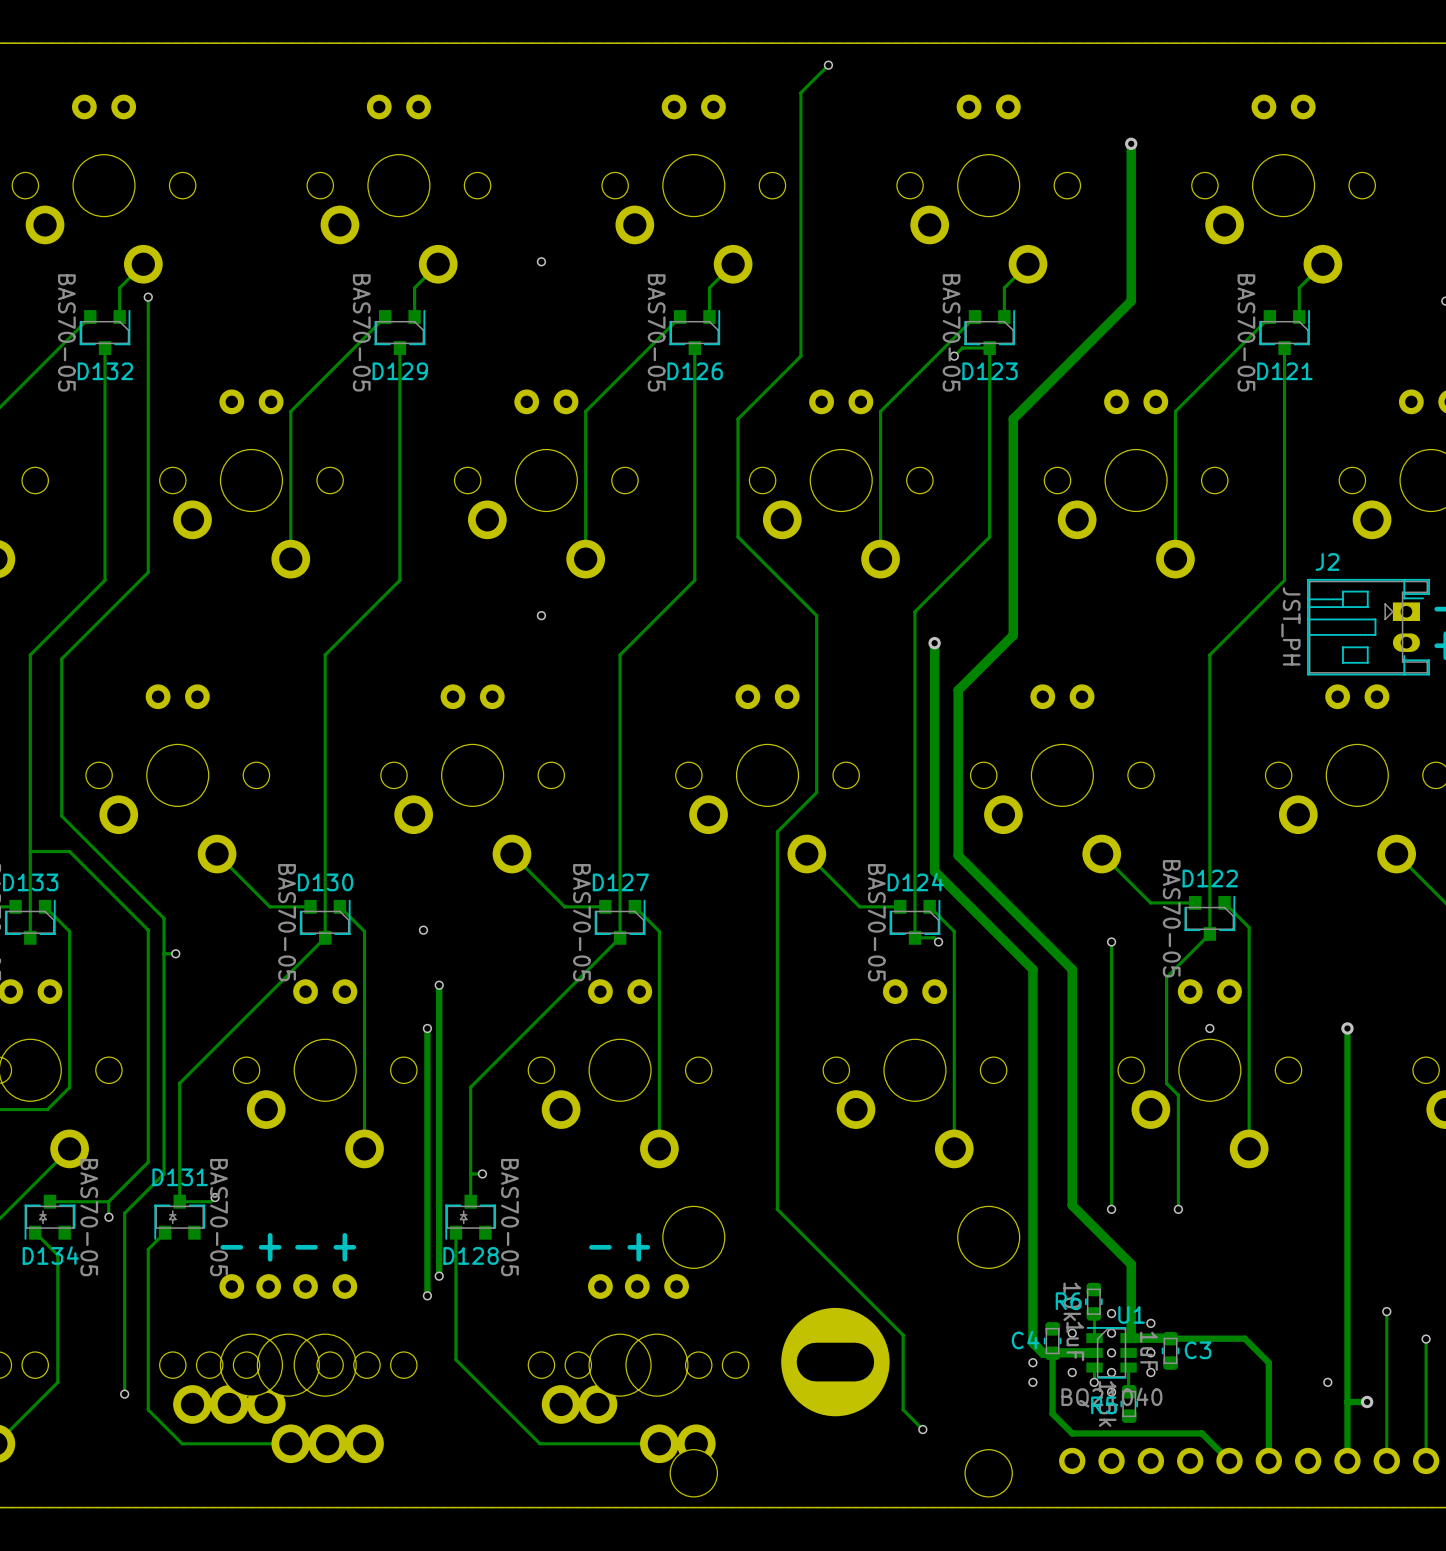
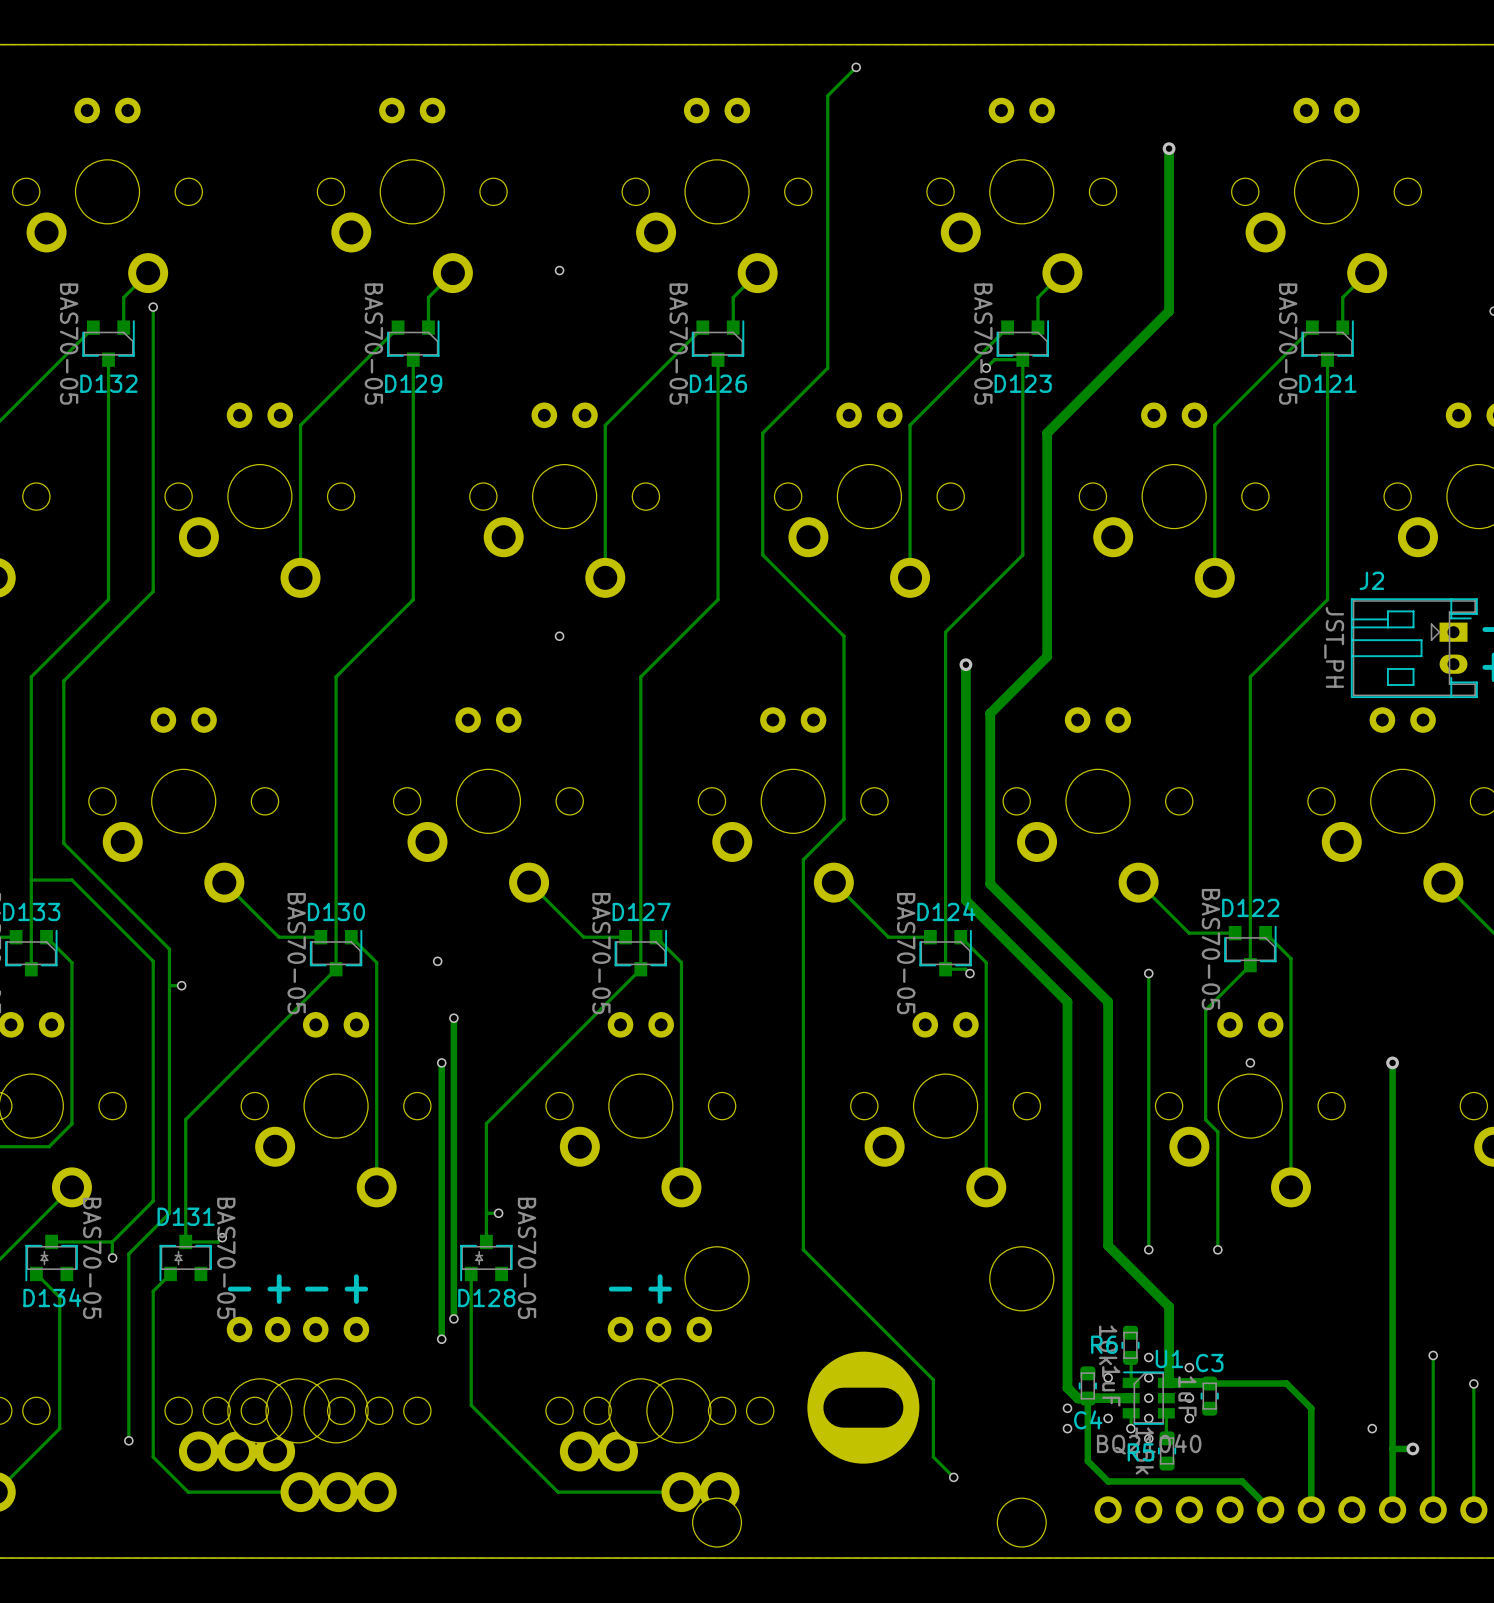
C4 name position: C4 (1025, 1340) -> C4 (1088, 1419)
C3 name position: C3 (1198, 1350) -> C3 (1209, 1363)

